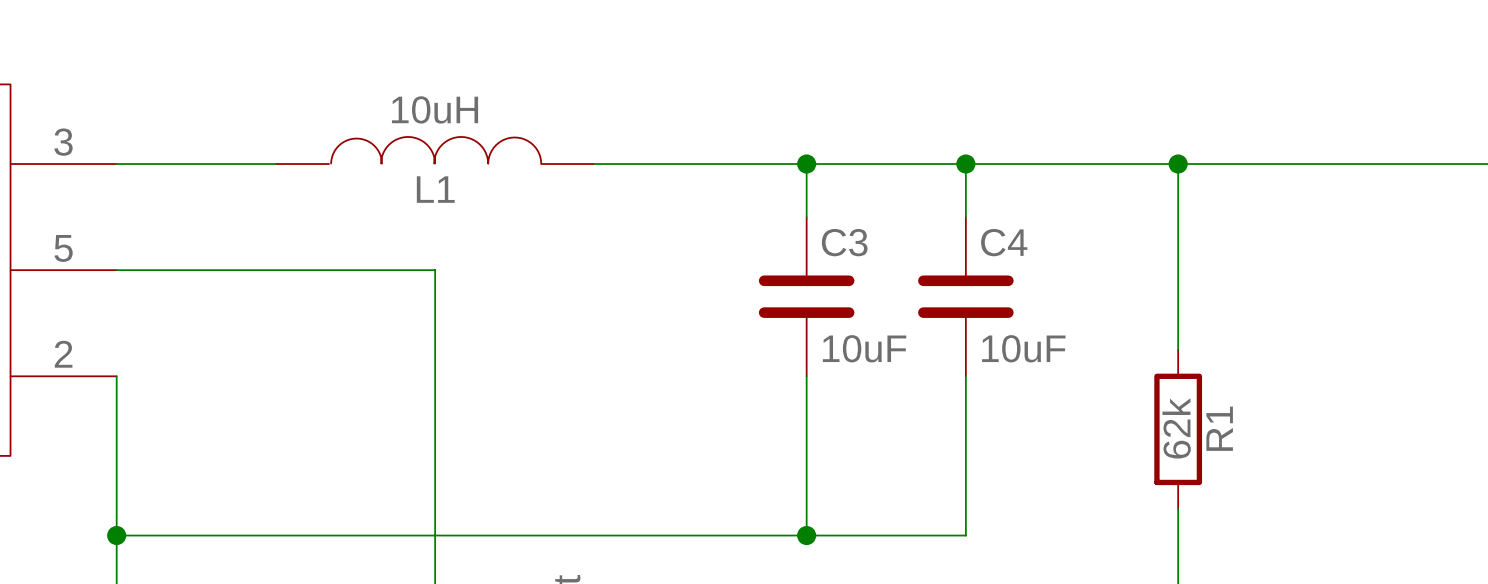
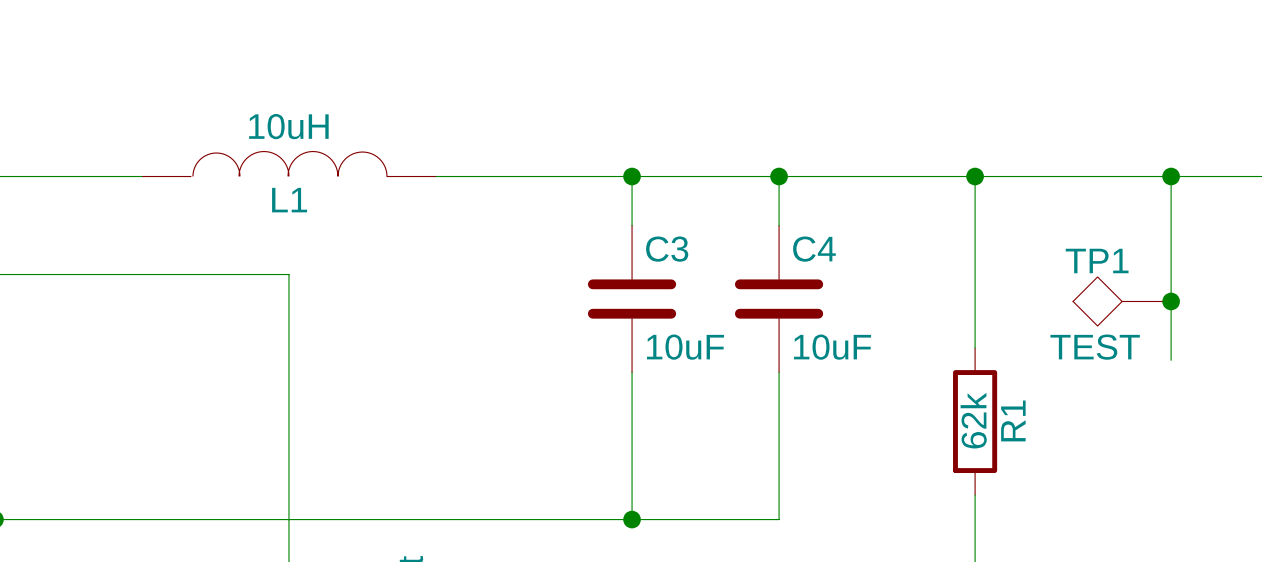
wire: none -> (1171, 176) (1171, 360)
junction: none -> (1171, 176)
TP1: none -> TEST (1122, 301)
junction: none -> (1171, 301)

